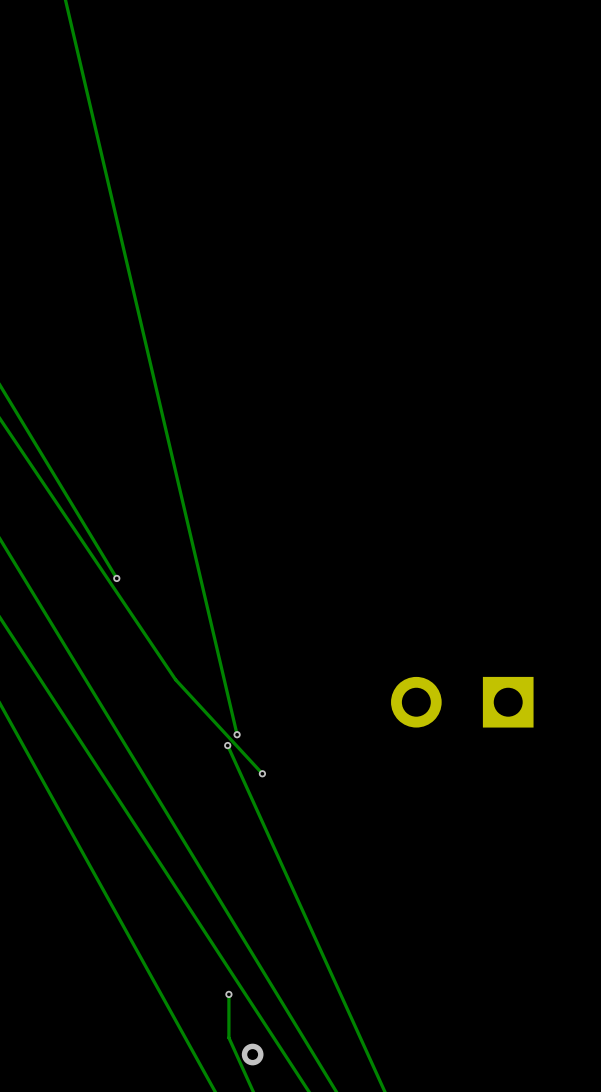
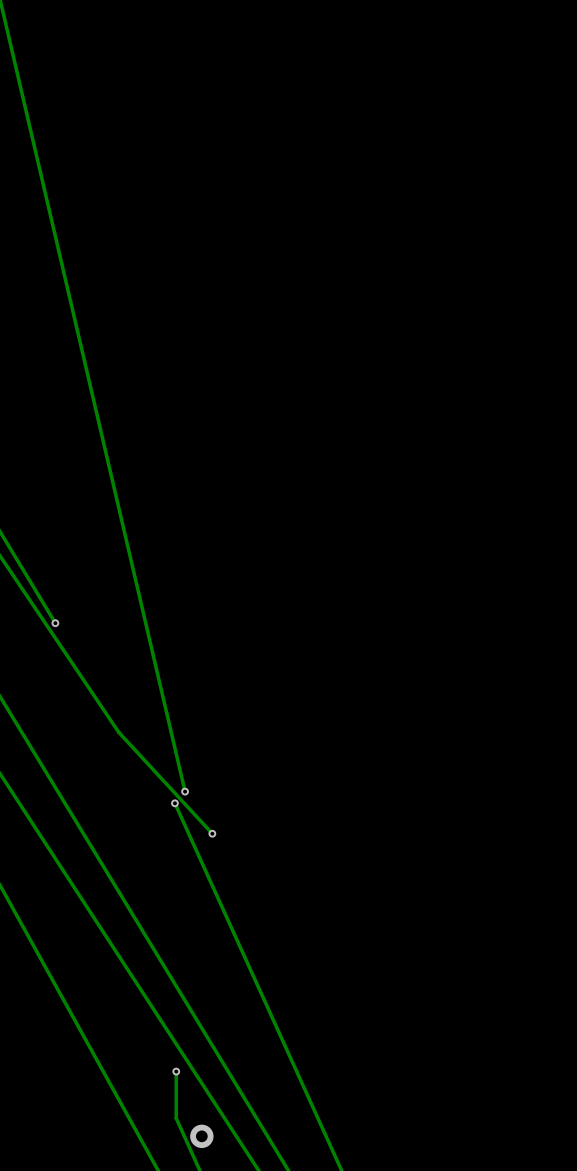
part: (462, 702) -> none

